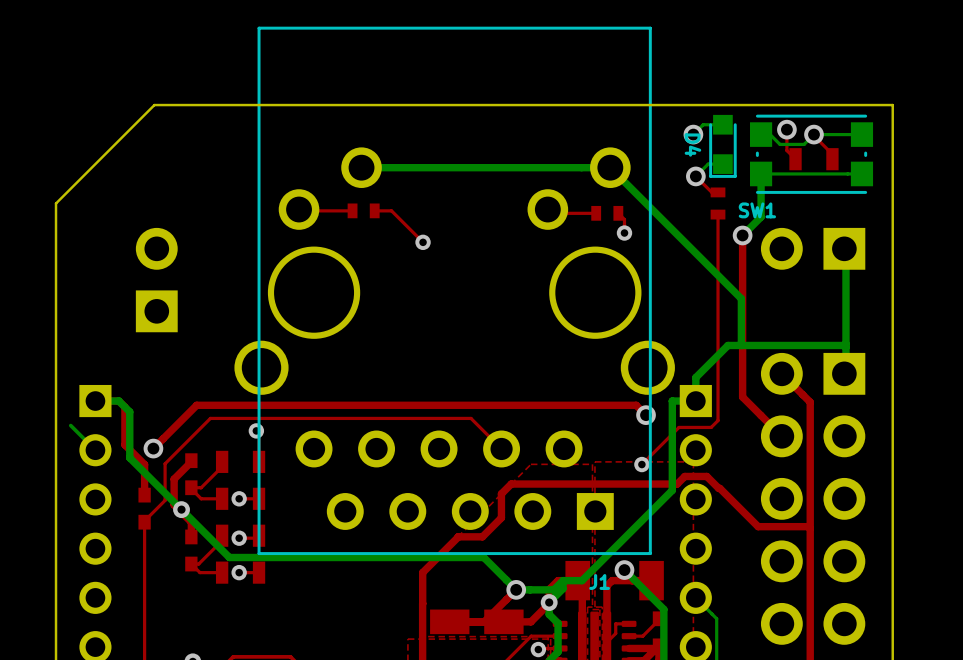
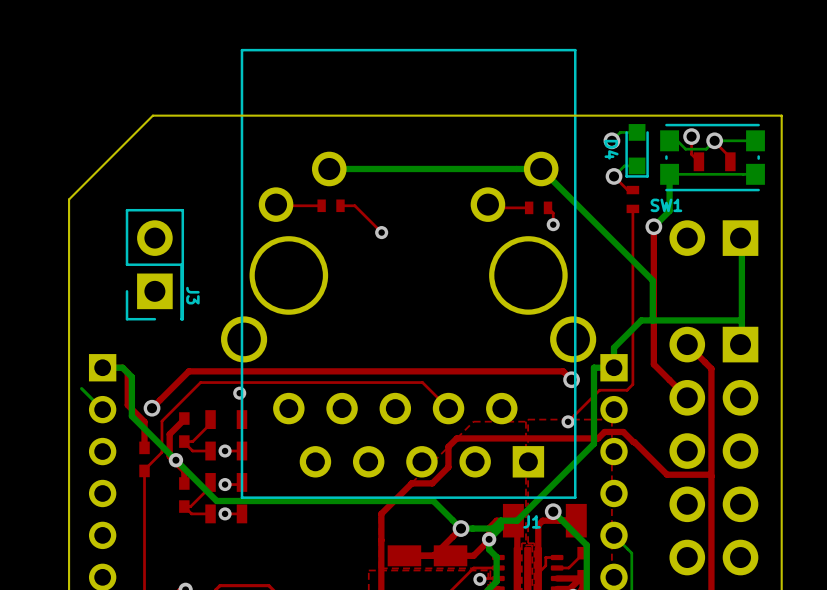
J3 side: top (156, 280) -> bottom (154, 264)

